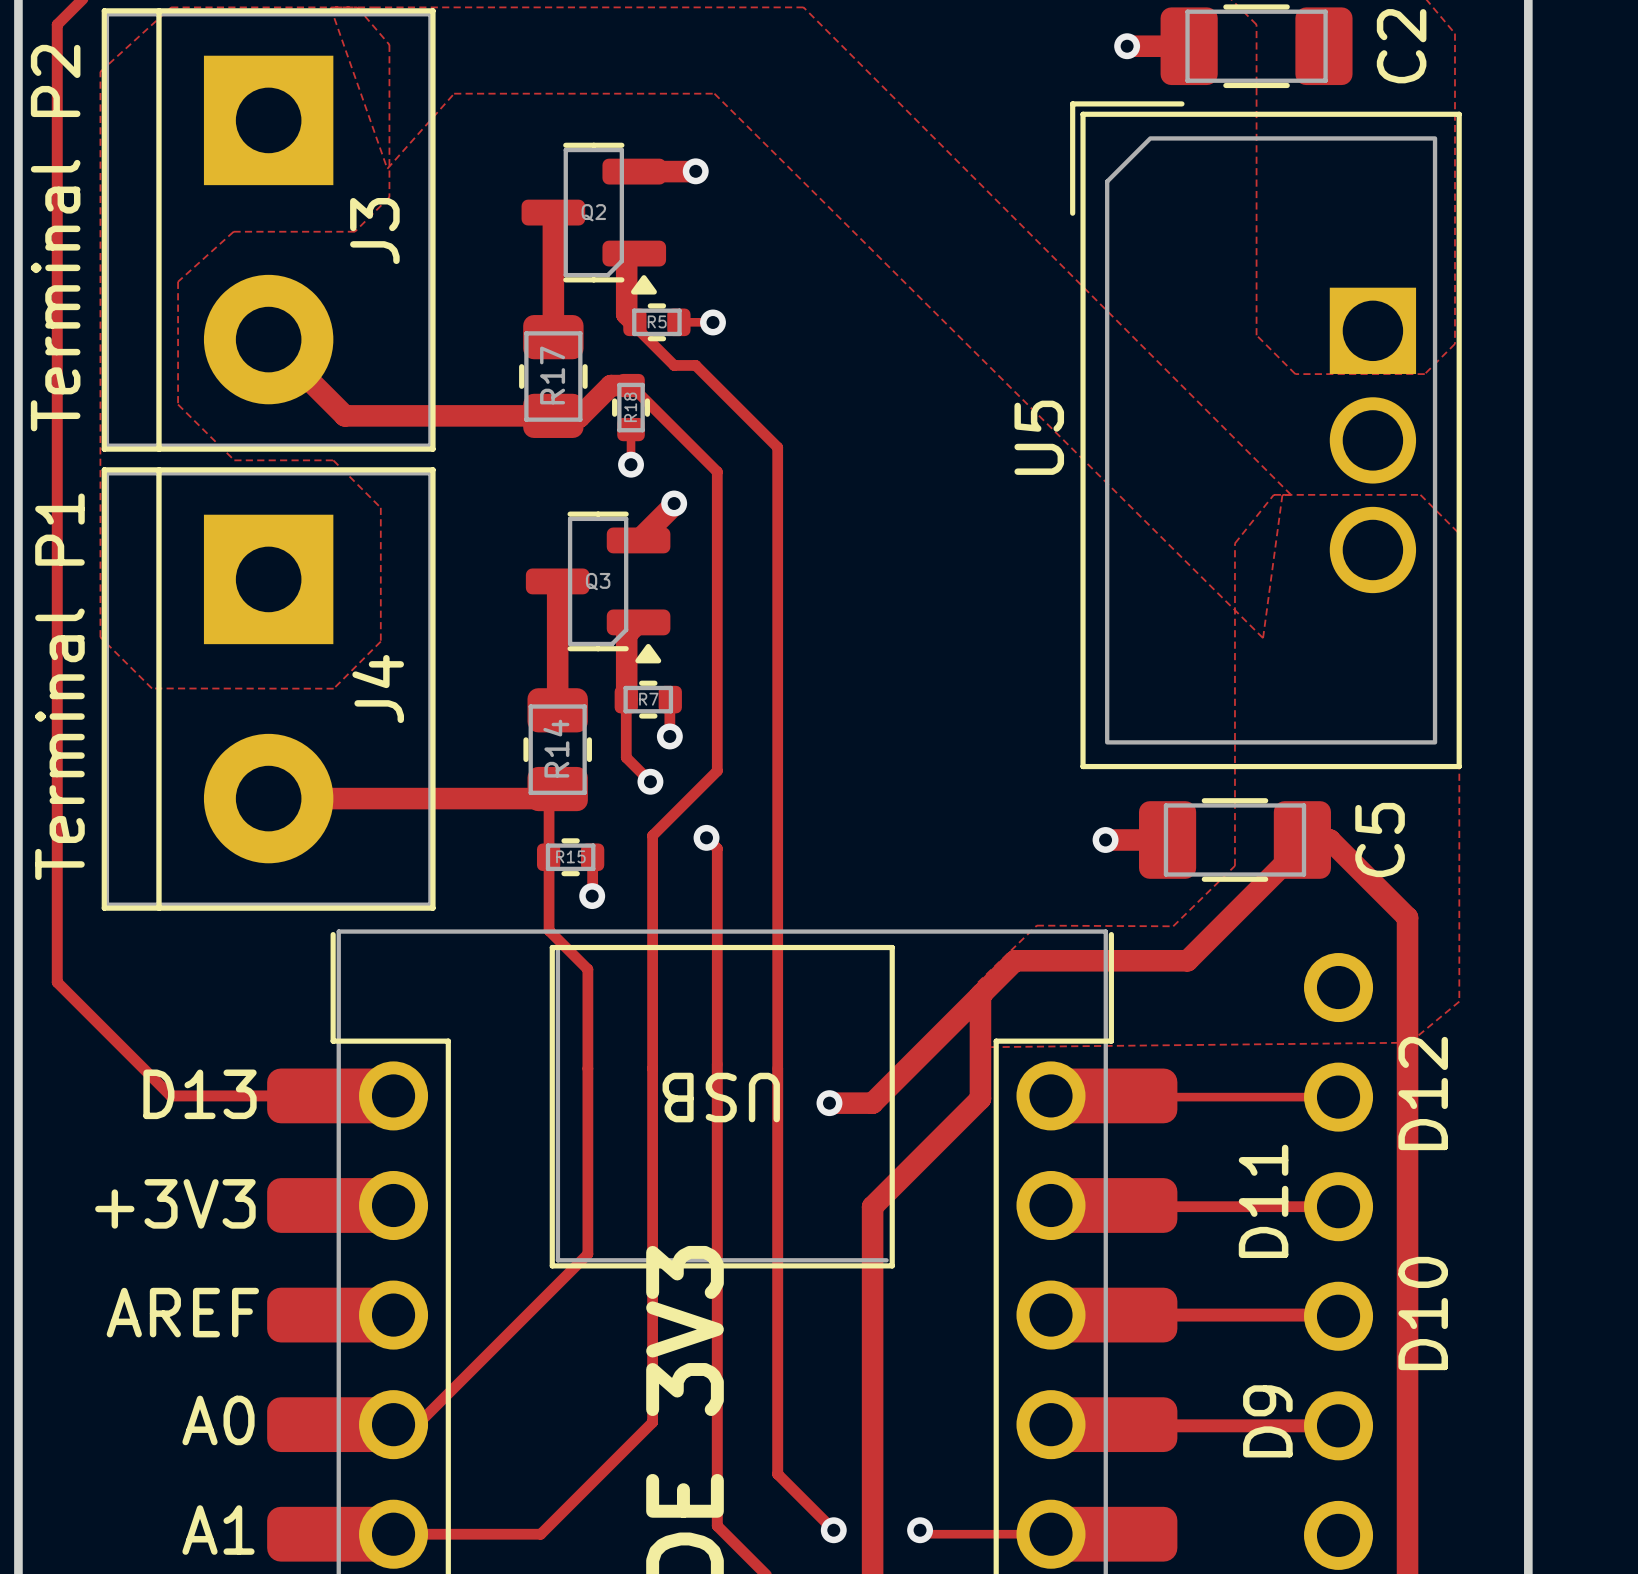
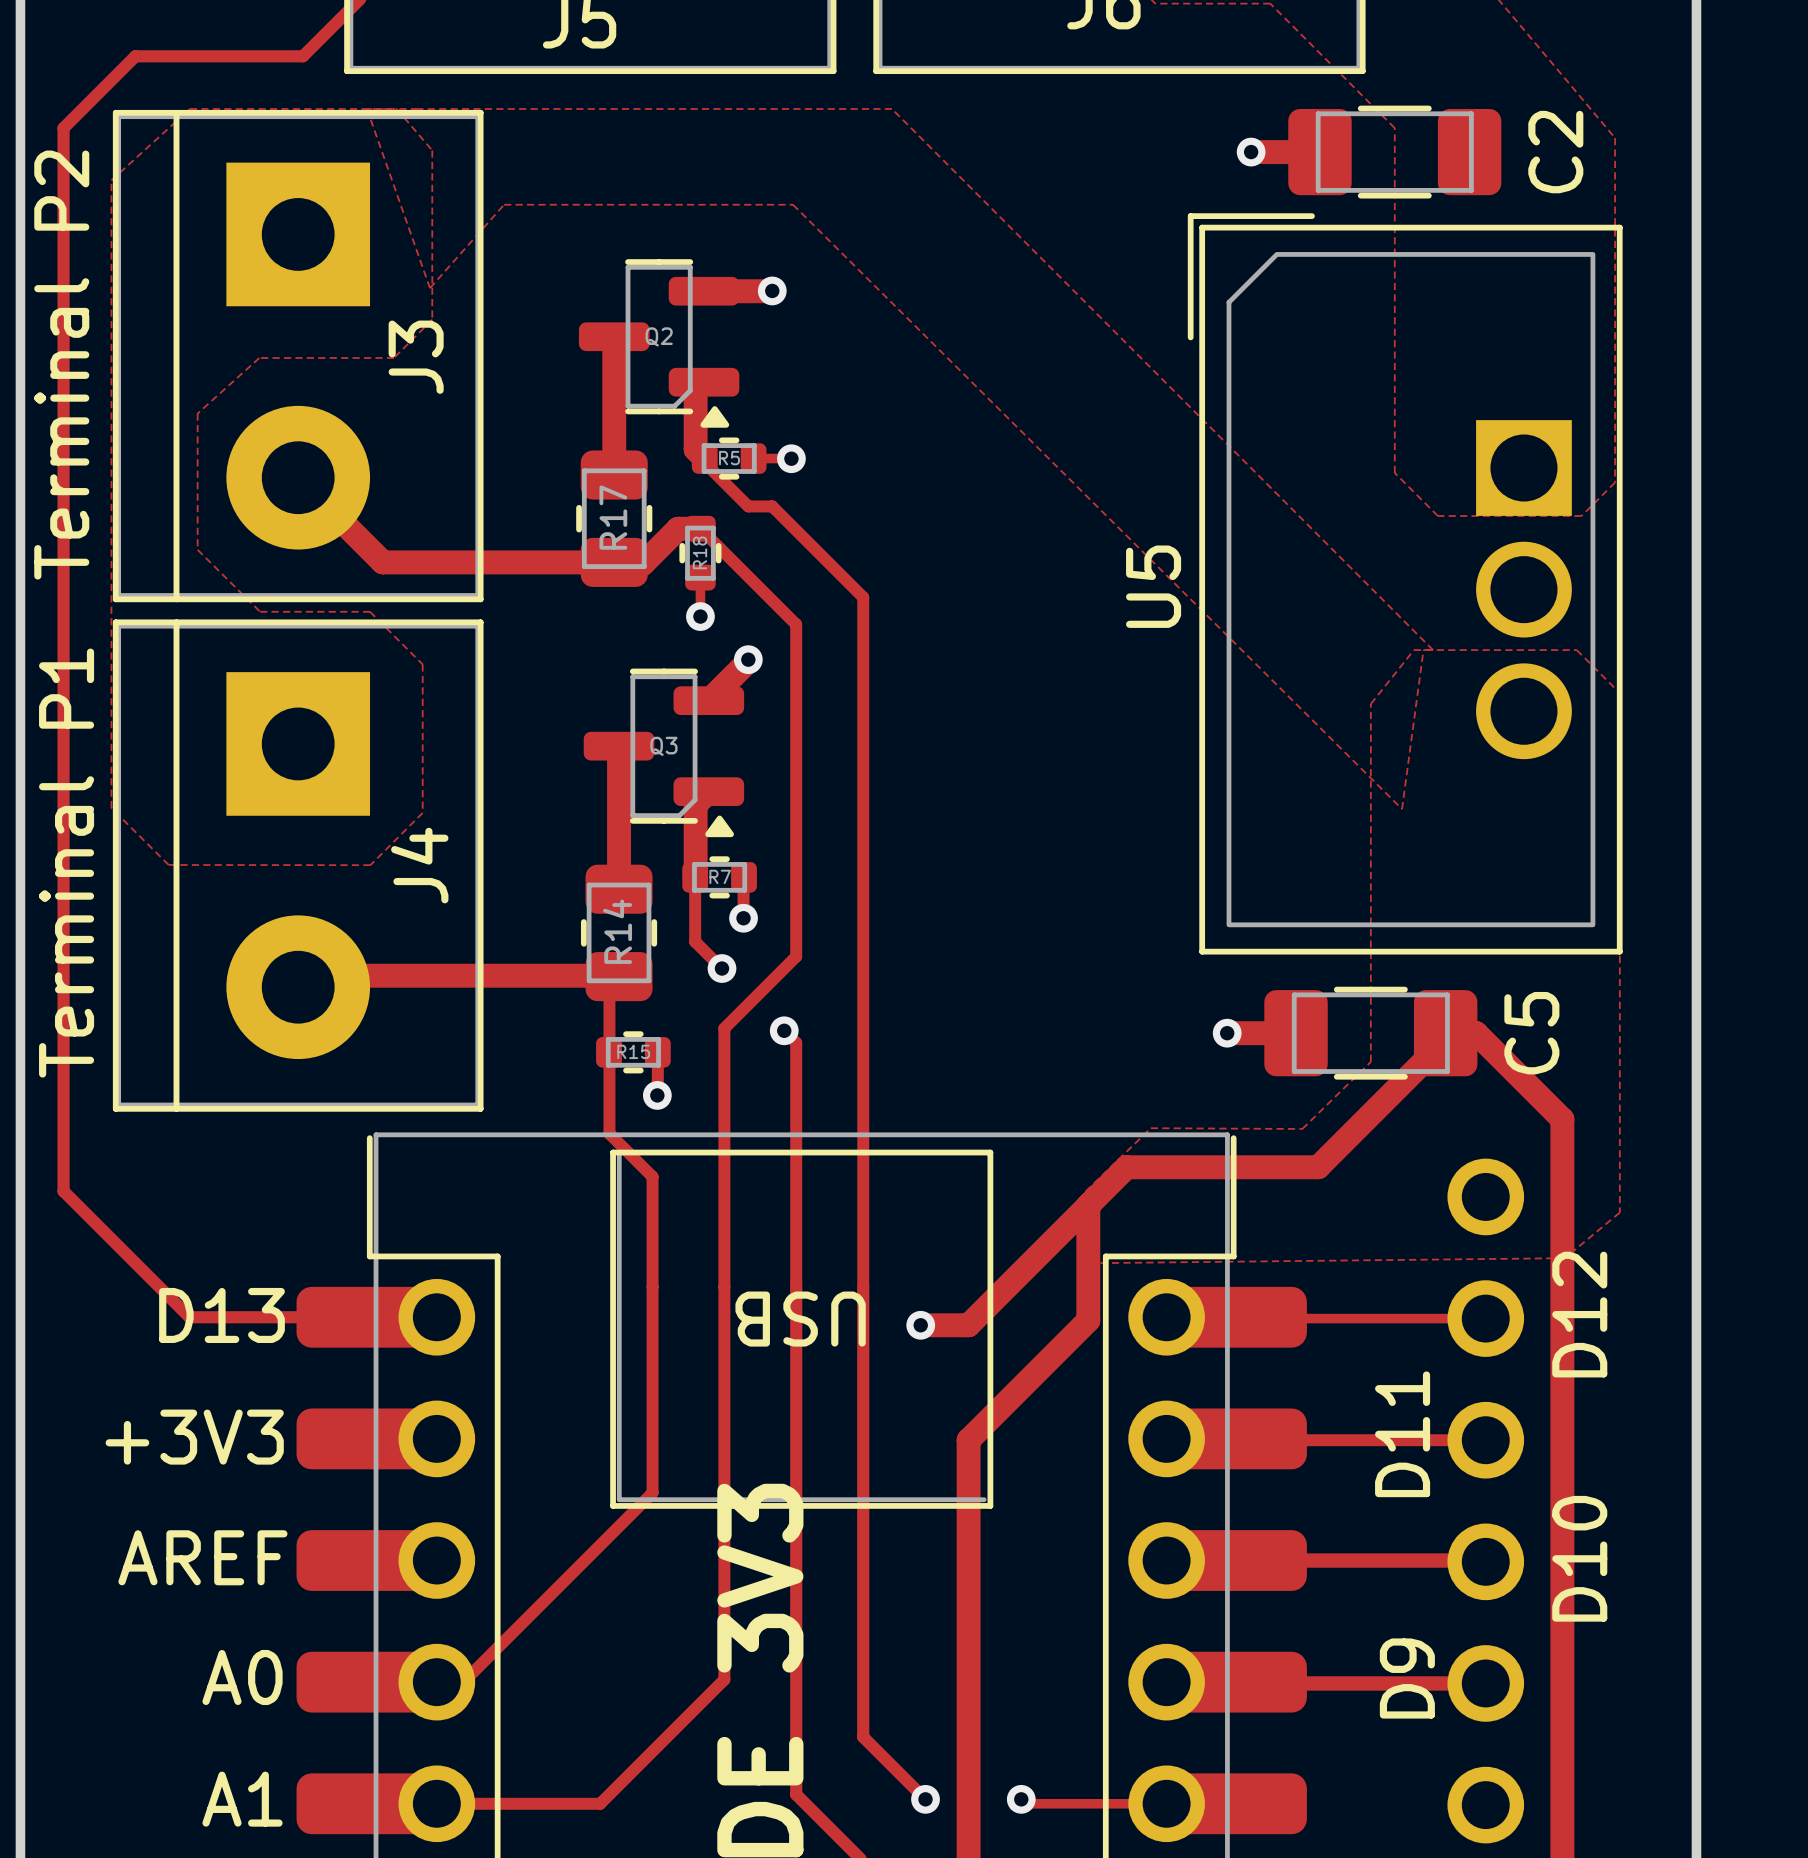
track: (557, 789) (548, 798) (317, 798) -> (619, 976) (309, 975) (298, 987)

